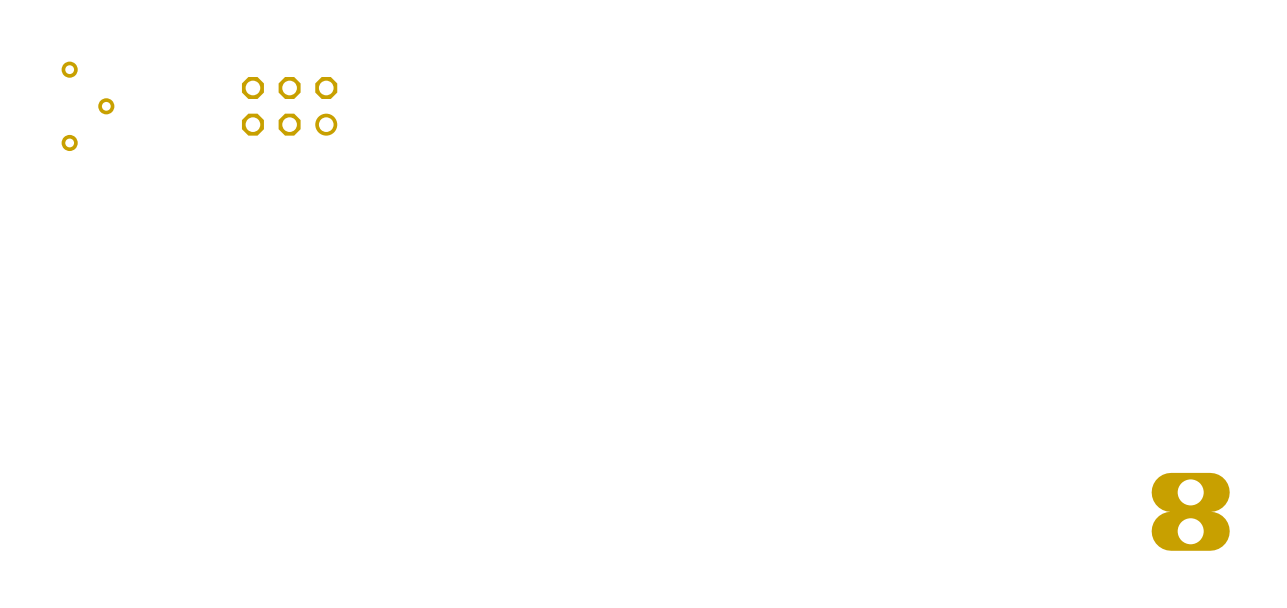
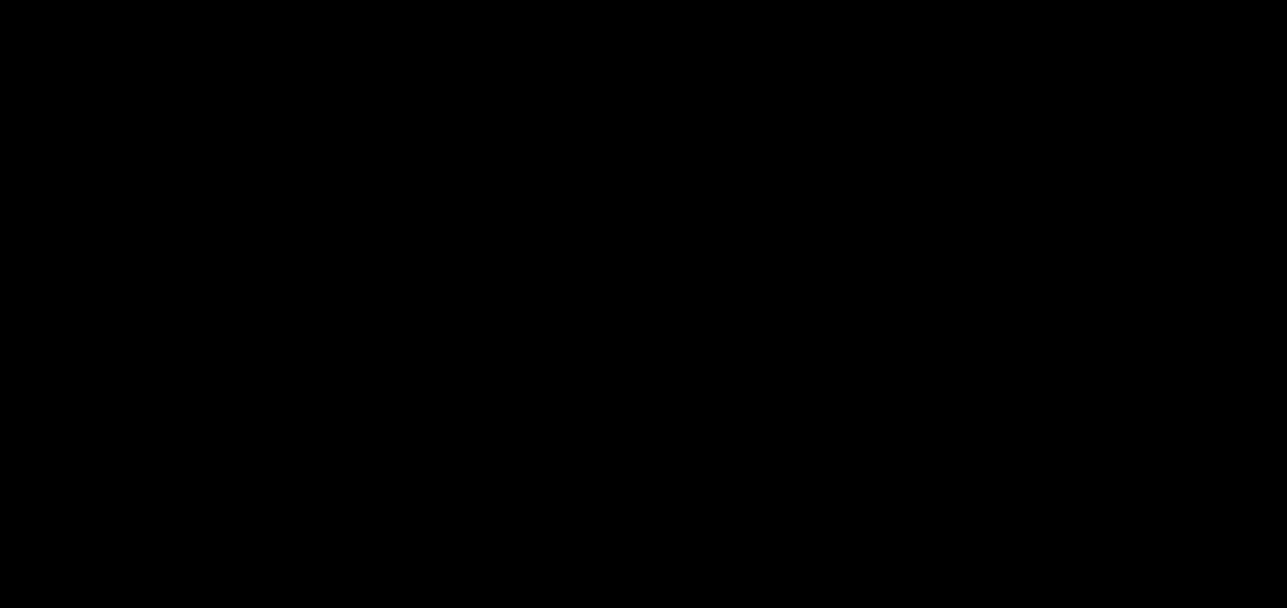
part: (87, 106) -> none
part: (289, 106) -> none
part: (1190, 511) -> none

